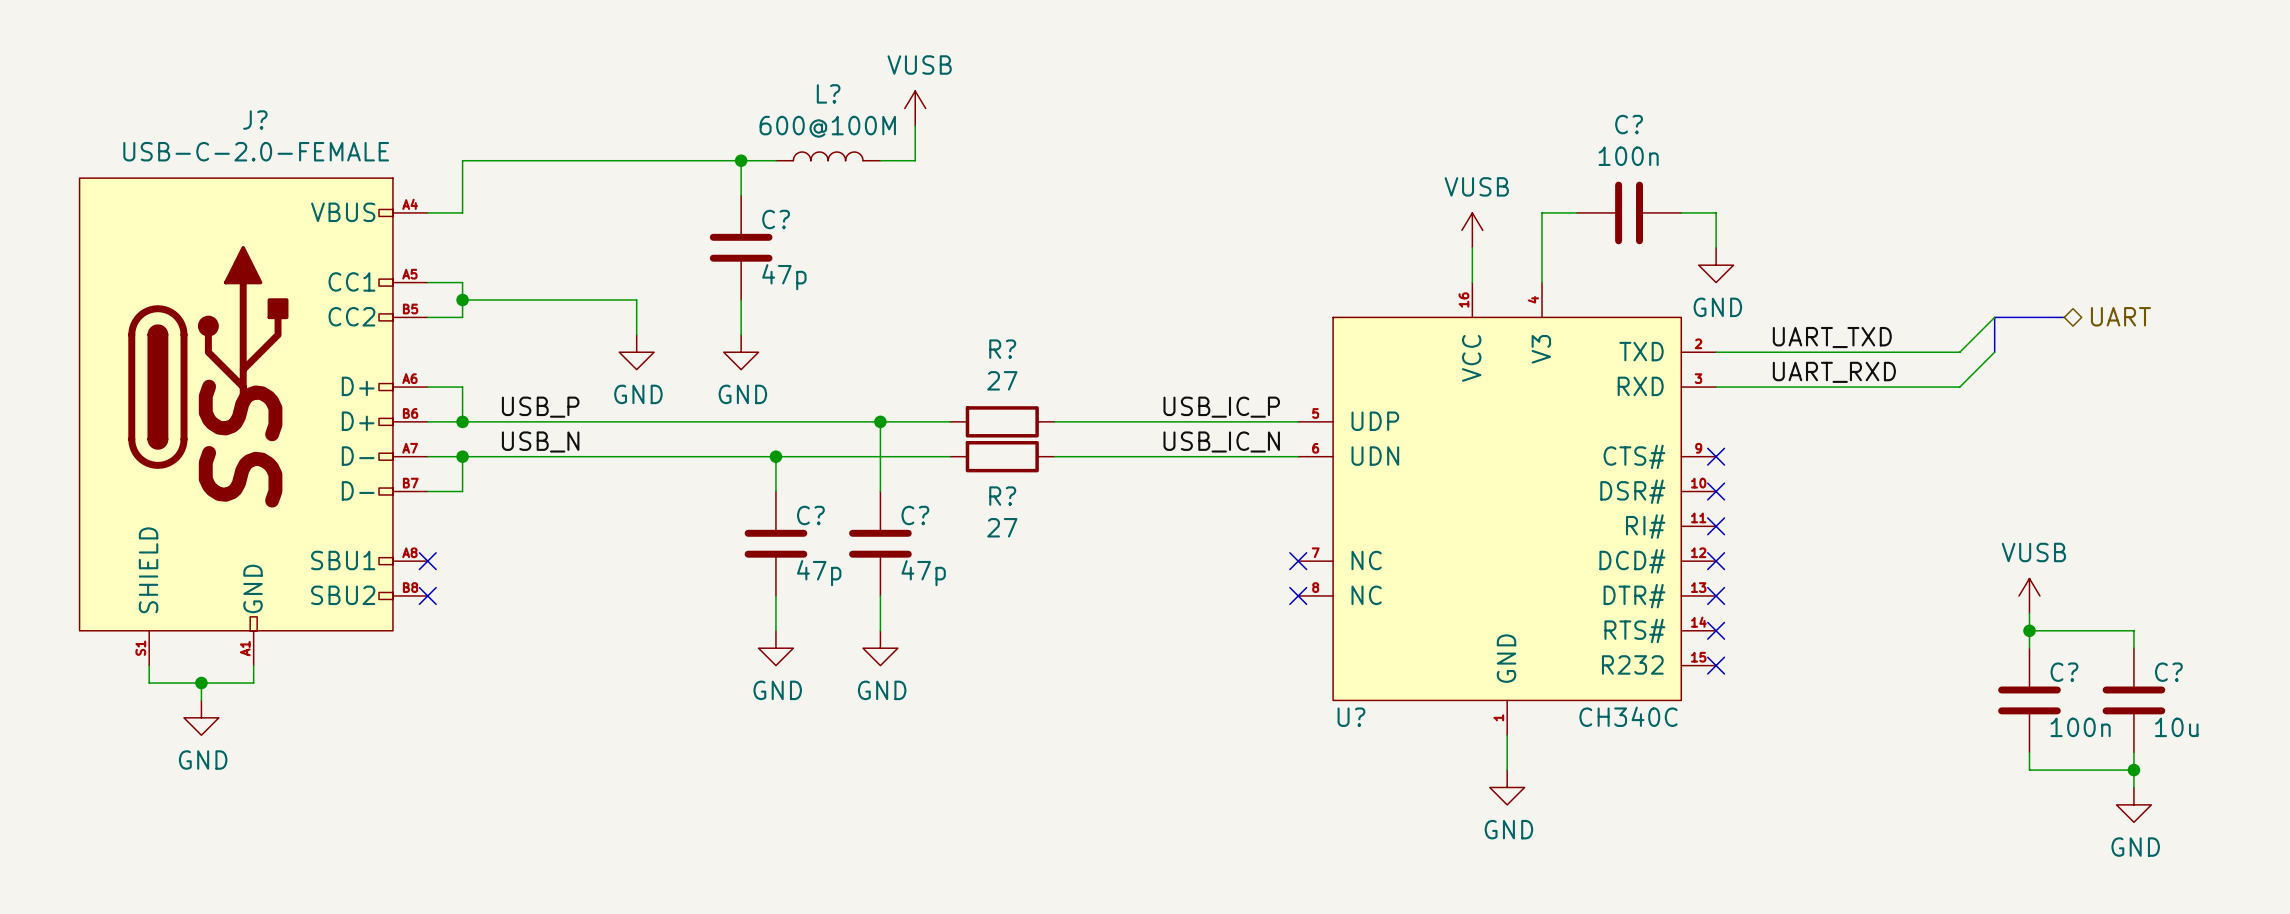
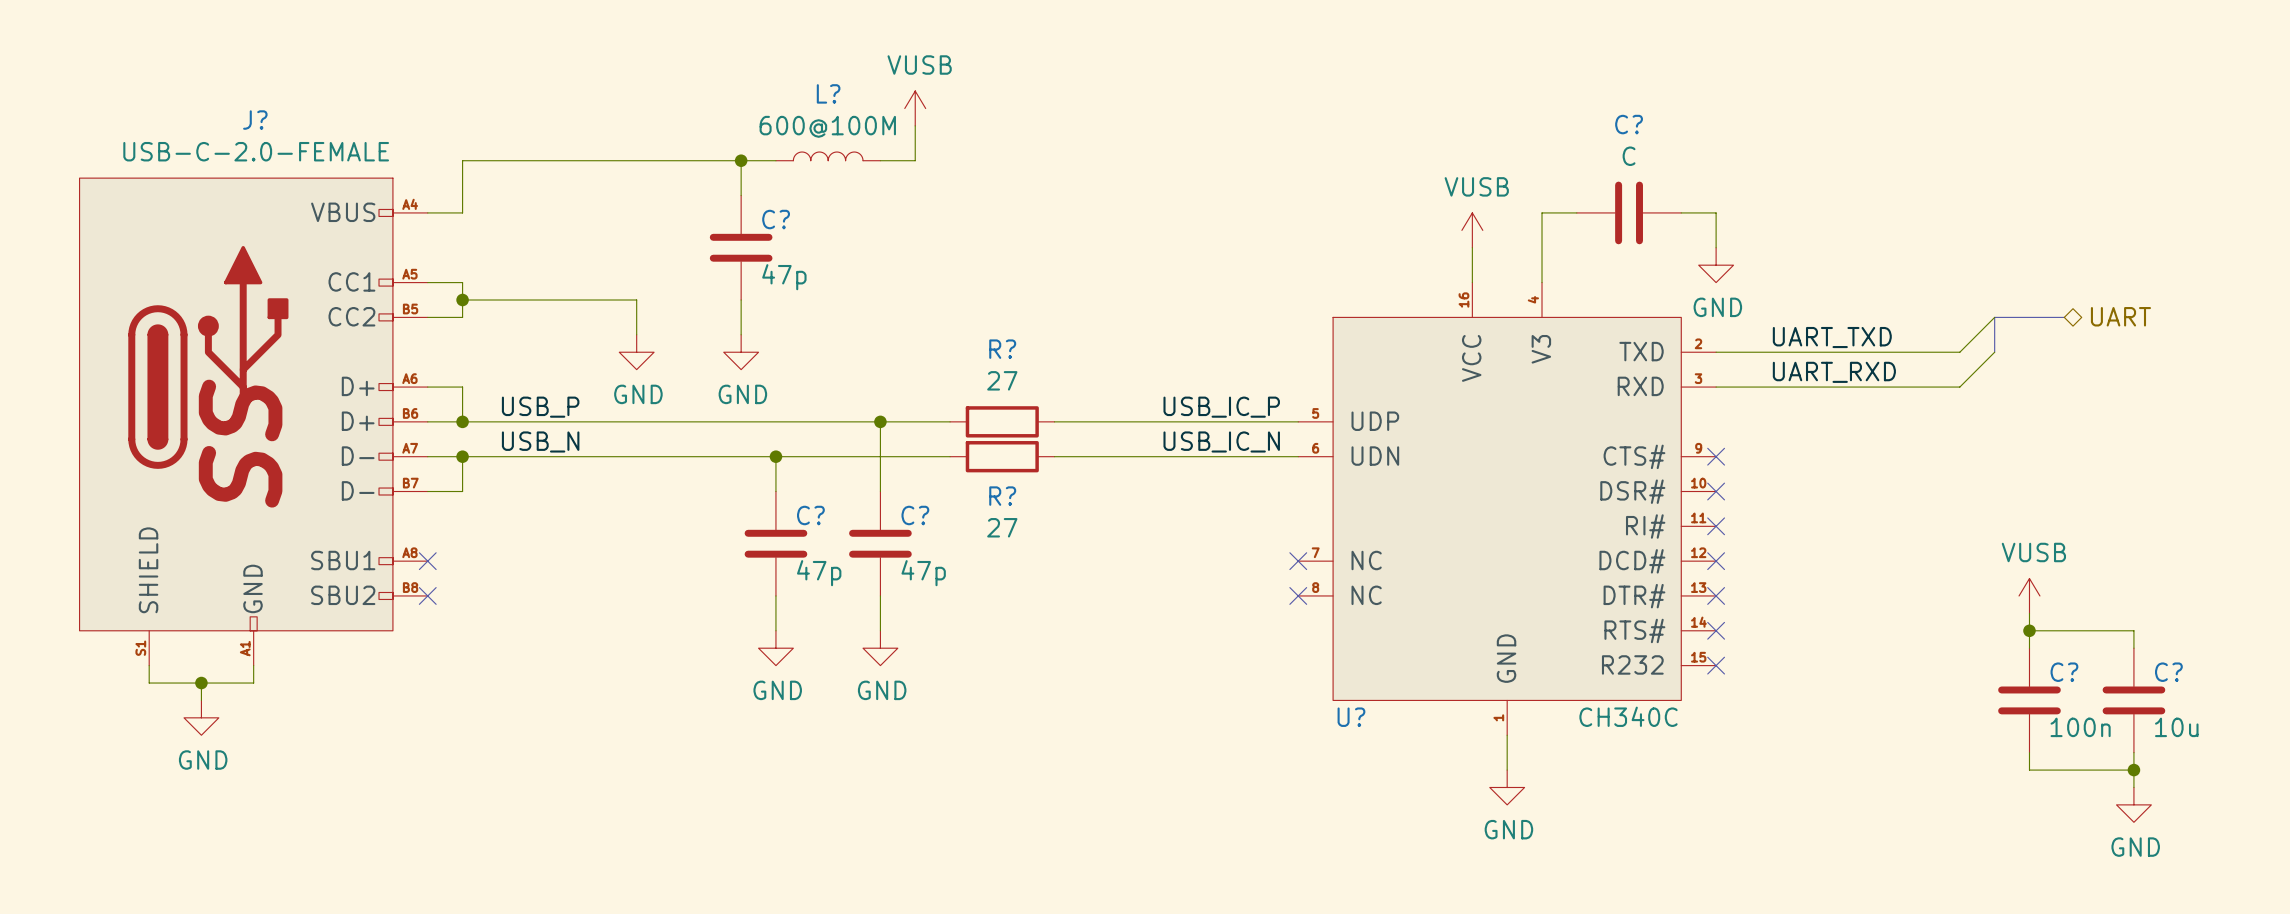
C? value: 100n (1628, 156) -> C (1629, 156)

